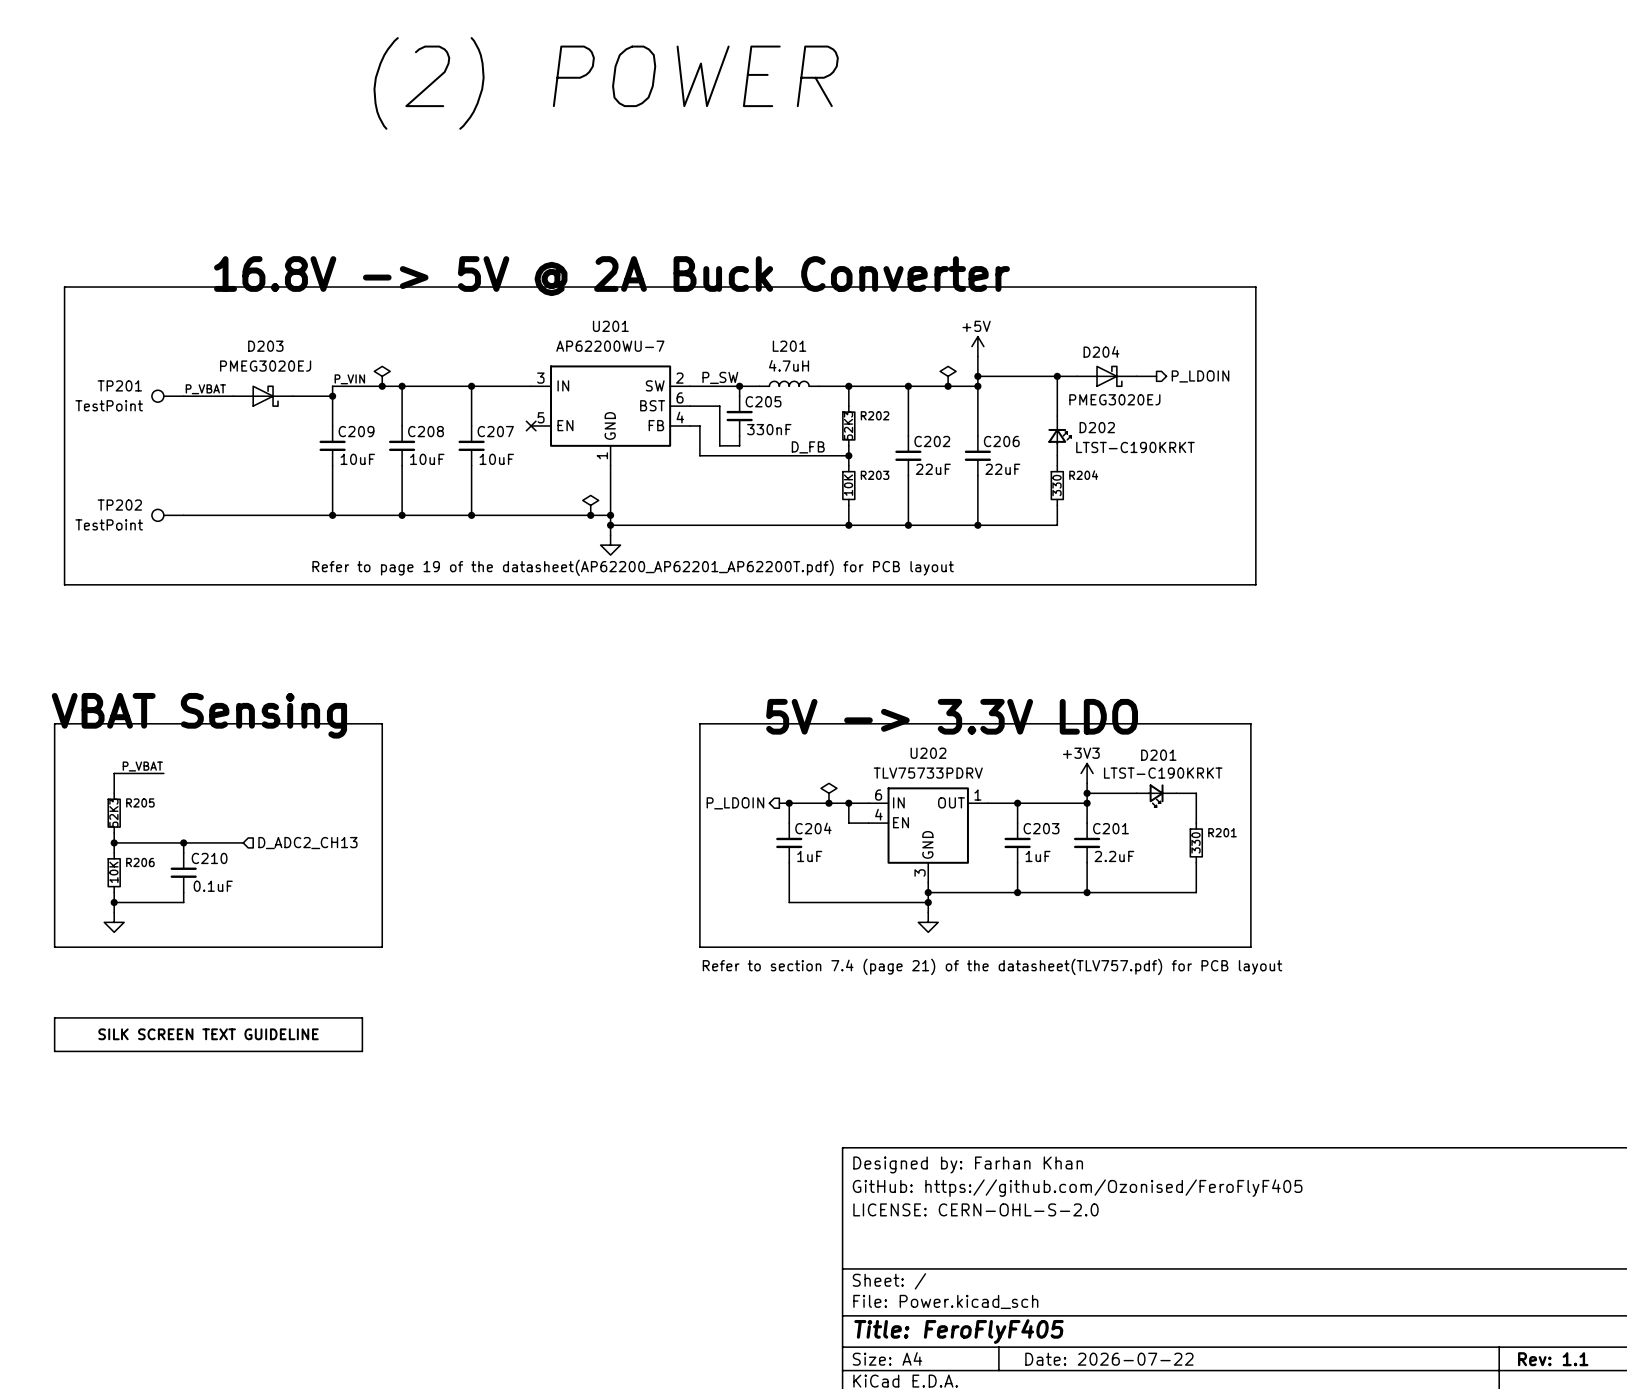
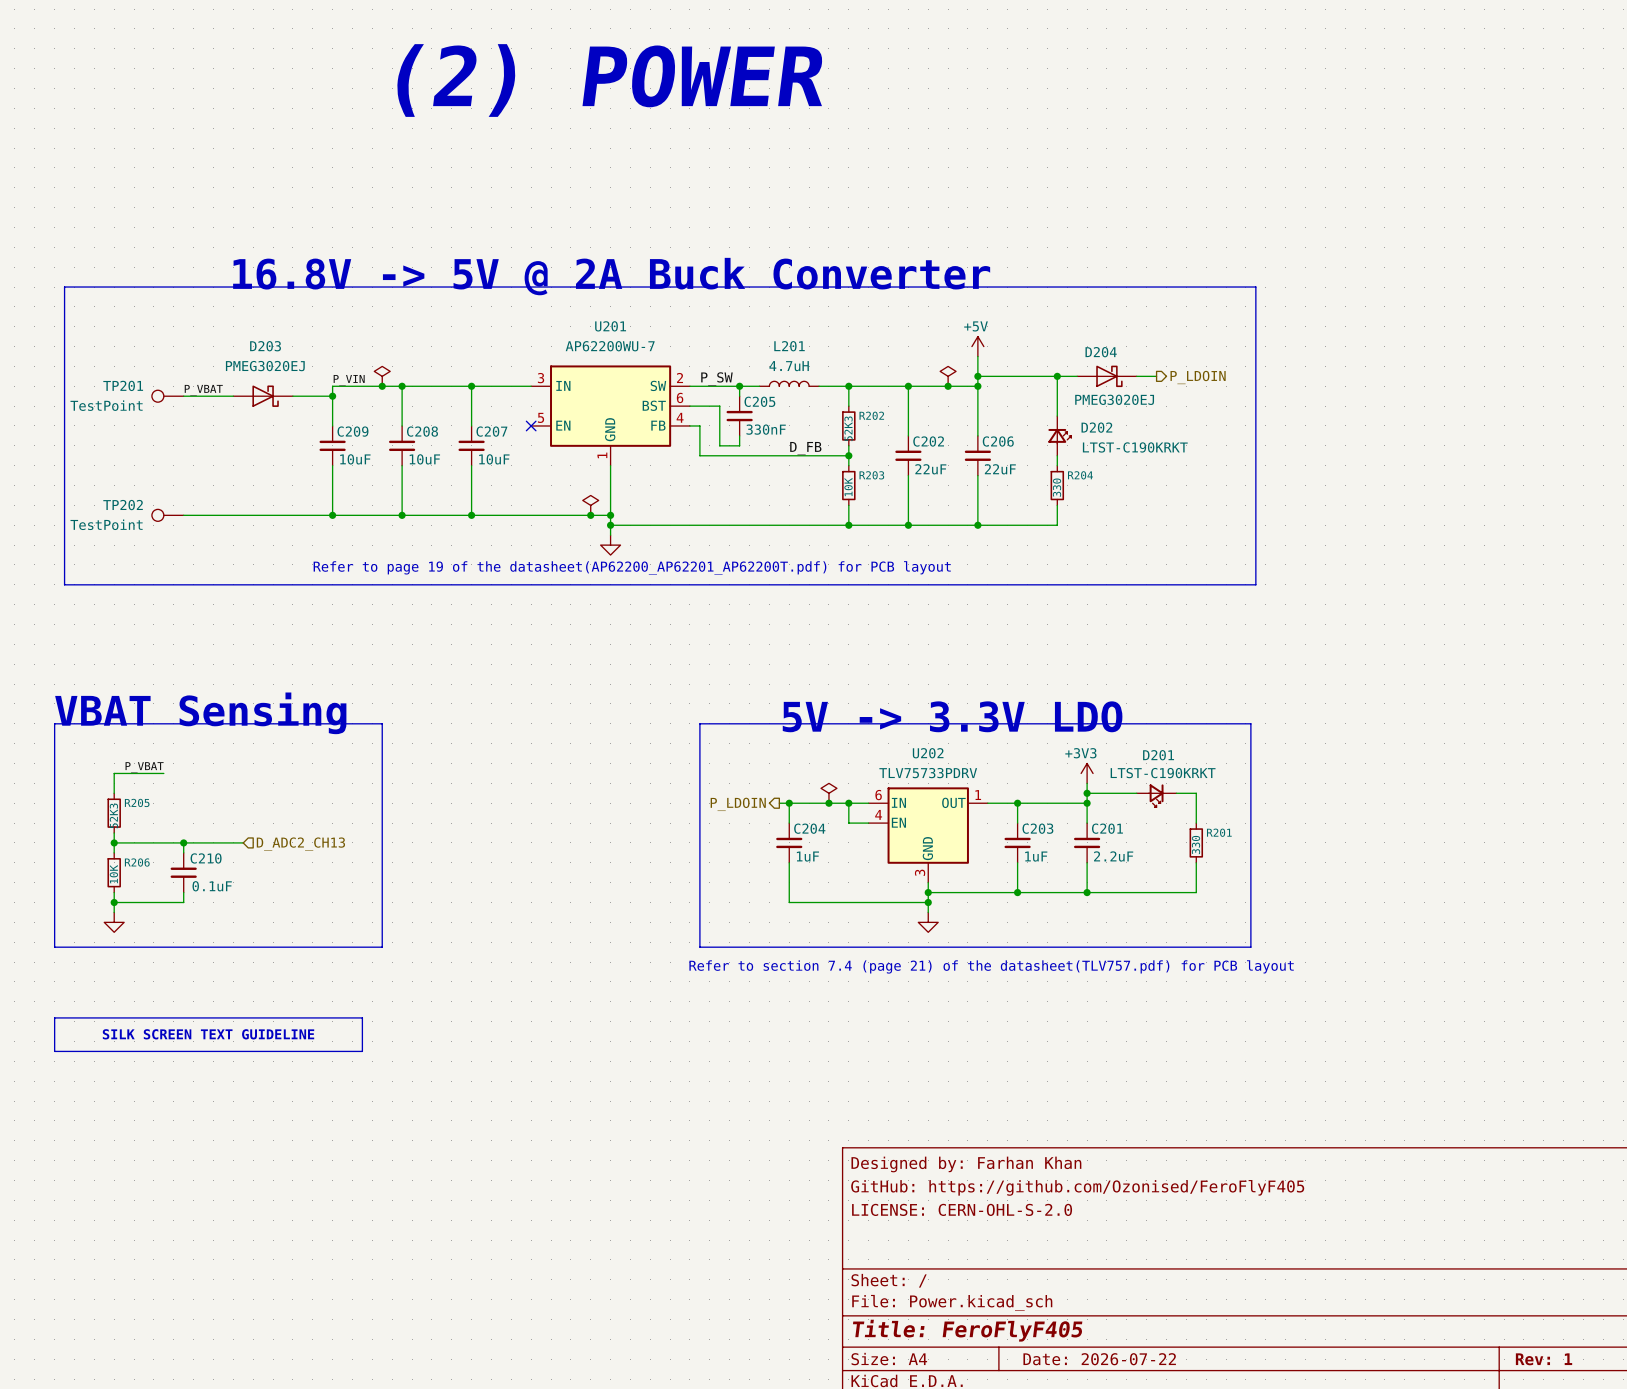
title block: Rev: 1.1 (1553, 1359) -> Rev: 1 (1544, 1359)

